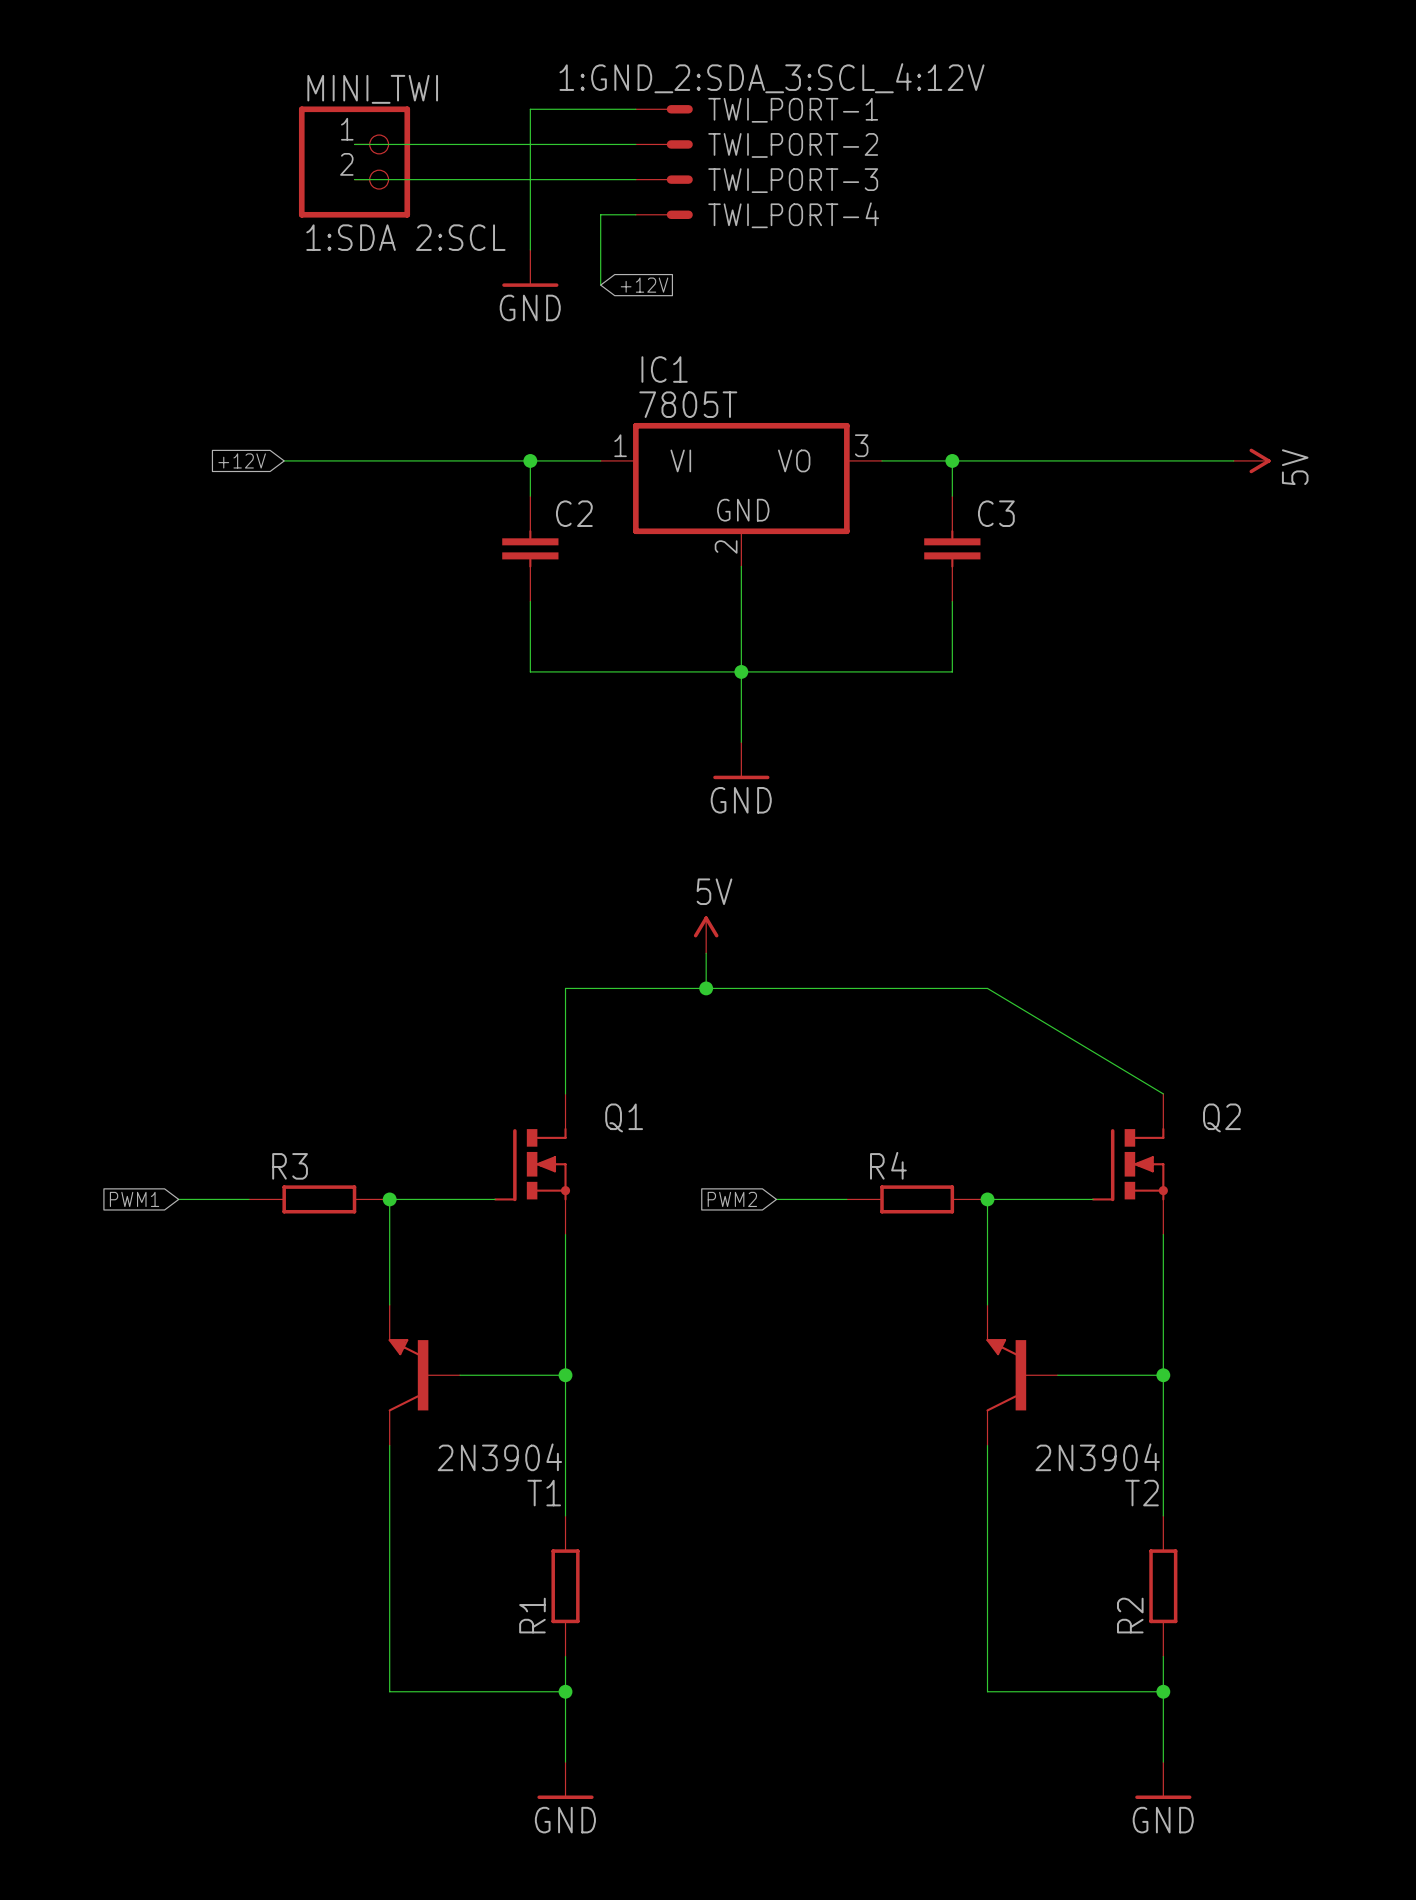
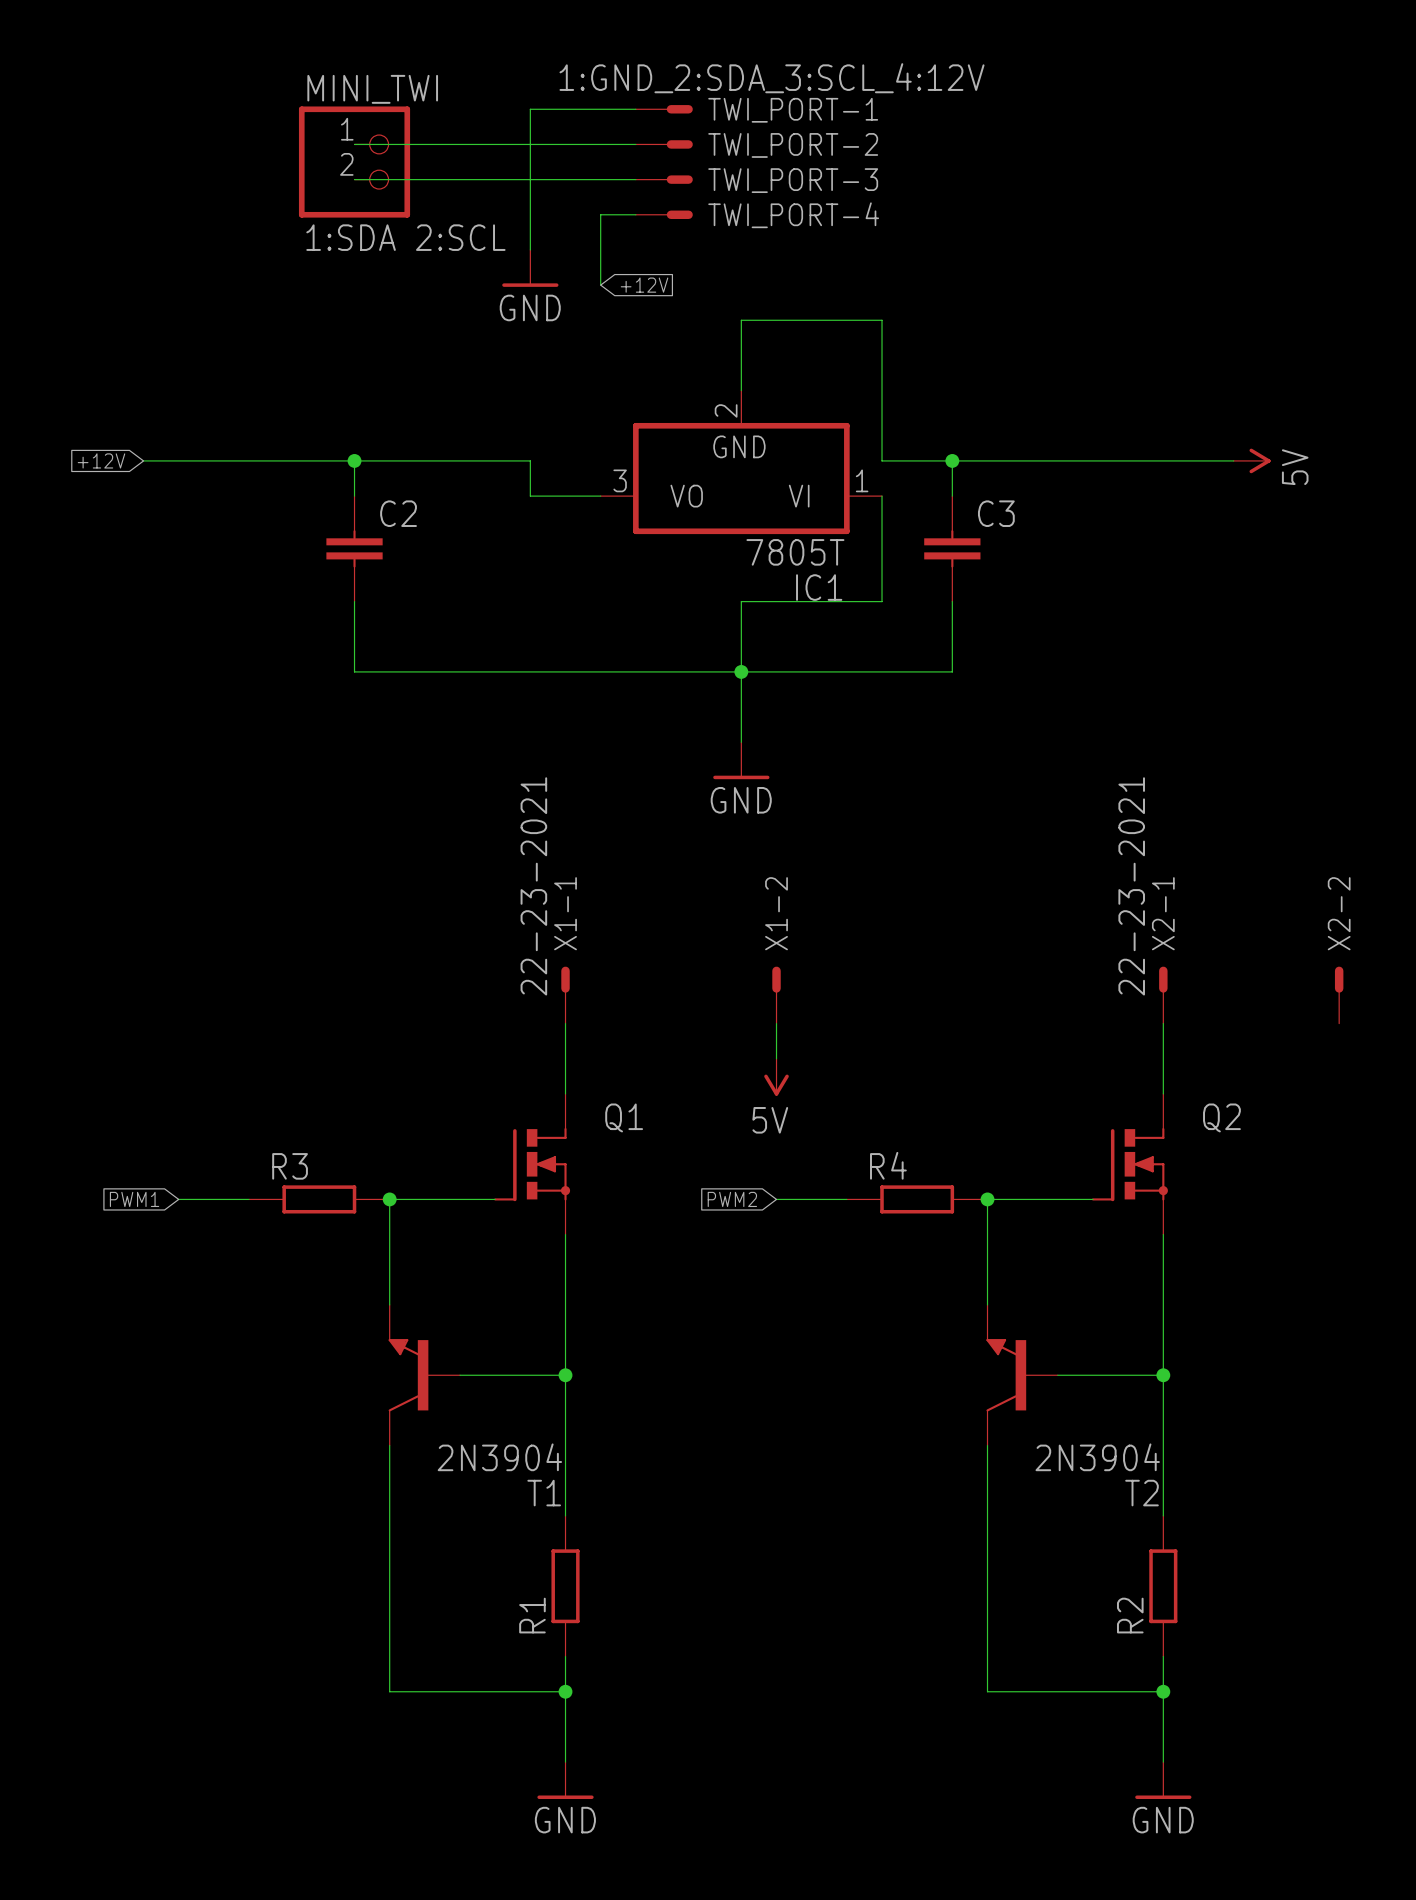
IC1 name position: IC1 (664, 369) -> IC1 (819, 587)
wire: none -> (741, 390) (741, 320) (882, 320) (882, 460)
IC1 value position: 7805T (688, 404) -> 7805T (795, 552)
IC1 symbol: [600, 422, 883, 567] -> [600, 390, 883, 535]
wire: none -> (143, 460) (284, 460)
global label position: +12V (242, 460) -> +12V (101, 460)
wire: none -> (354, 460) (354, 496)
junction: none -> (354, 460)
wire: (530, 460) (600, 460) -> (530, 496) (600, 496)
junction: (530, 460) -> none
C2 position: (530, 548) -> (354, 548)
wire: (741, 566) (741, 601) -> (882, 496) (882, 601) (741, 601)
wire: (530, 601) (530, 671) -> (354, 601) (354, 671) (530, 671)
power symbol rotation: 0° (706, 926) -> 180° (776, 1085)
power symbol position: 5V (706, 934) -> 5V (776, 1077)
wire: (706, 953) (706, 988) -> (776, 1023) (776, 1058)
junction: (706, 988) -> none
X1-1: none -> 22-23-2021 (565, 995)
X1-2: none -> (776, 995)
X2-1: none -> 22-23-2021 (1163, 995)
X2-2: none -> (1339, 995)
wire: (565, 1023) (565, 988) (987, 988) (1163, 1093) -> (1163, 1023) (1163, 1093)

